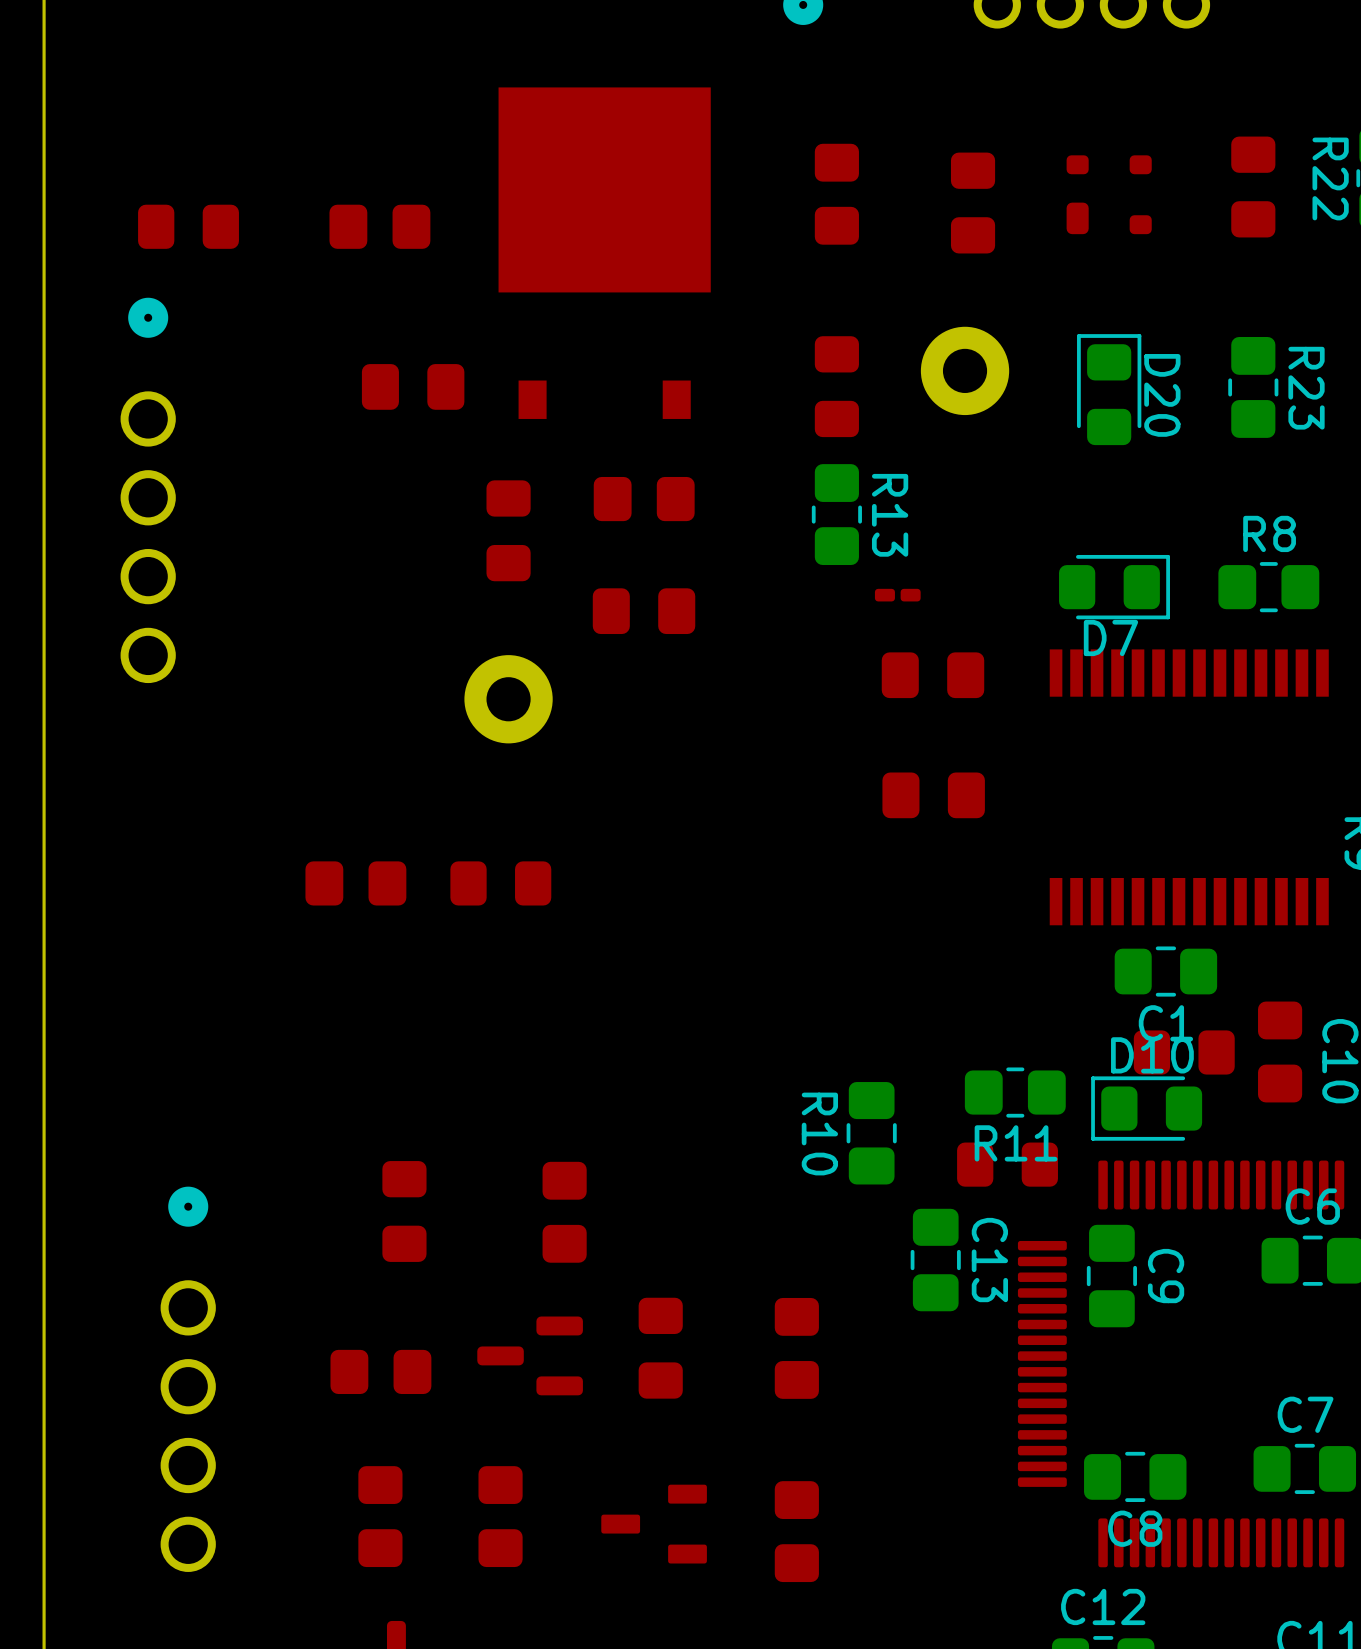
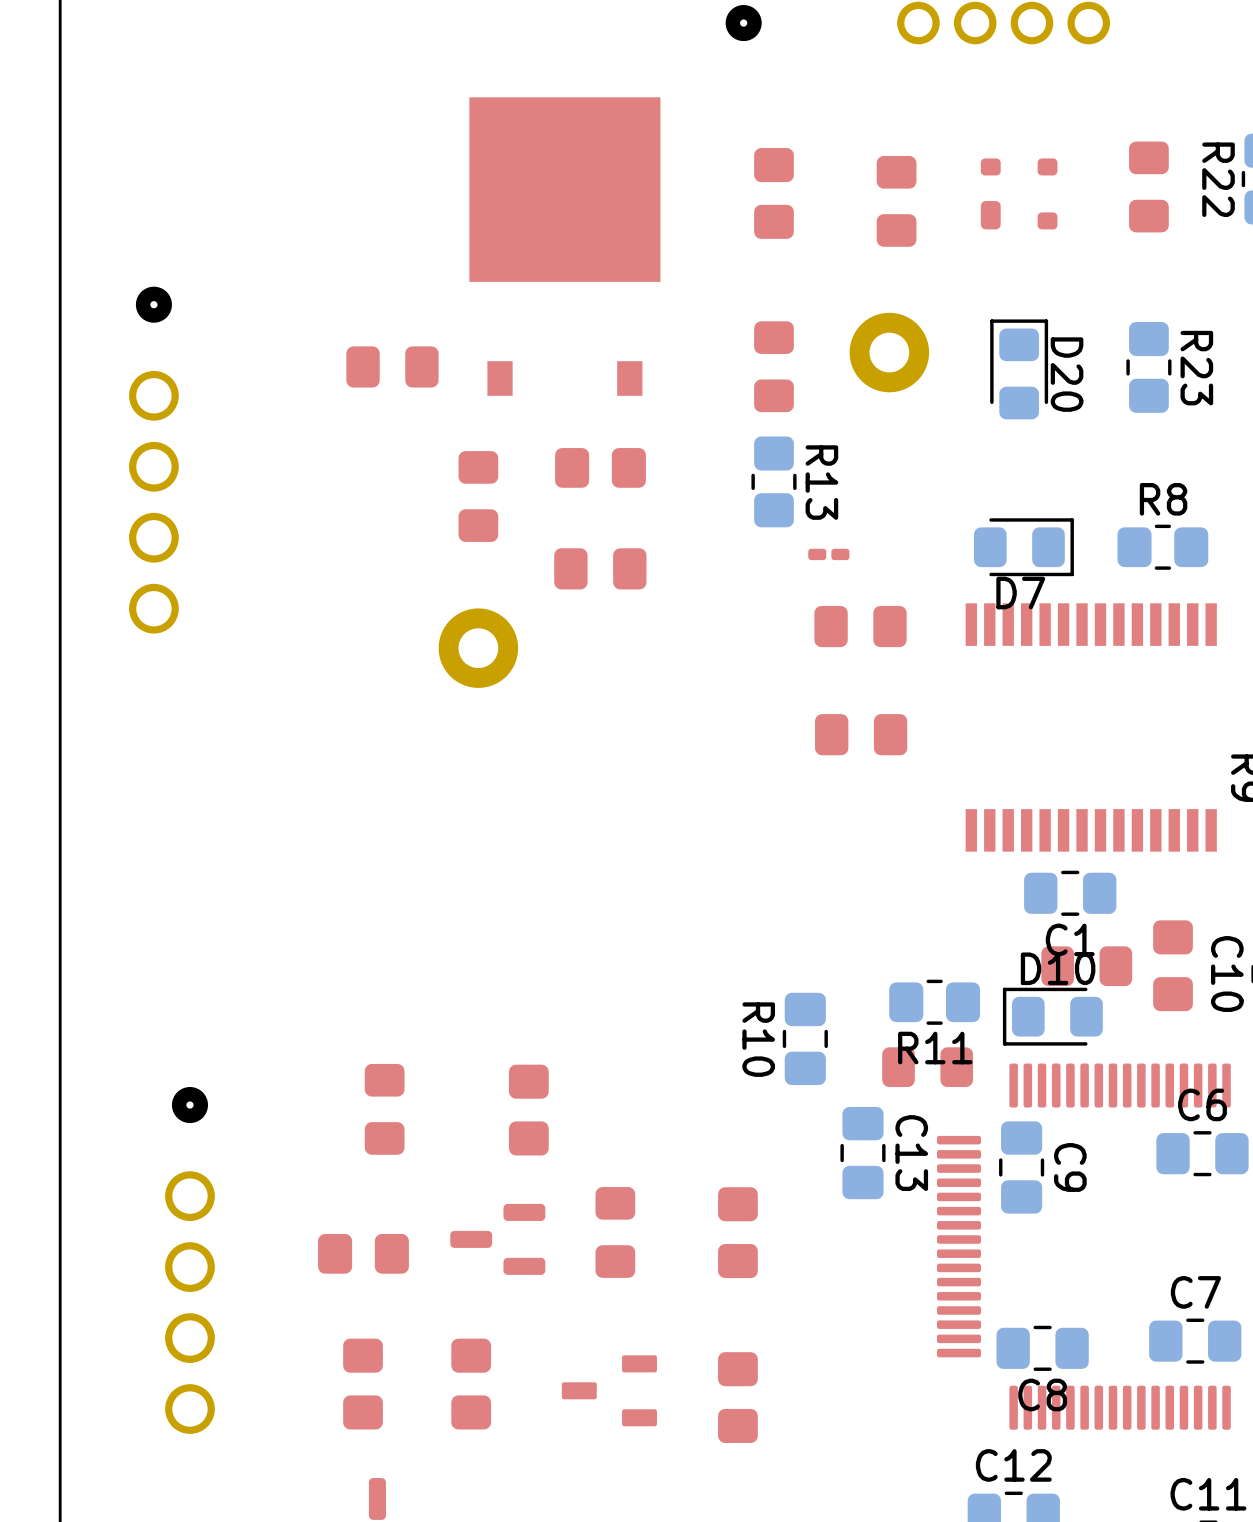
part: (188, 226) -> none
part: (379, 226) -> none
part: (355, 883) -> none
part: (500, 883) -> none

